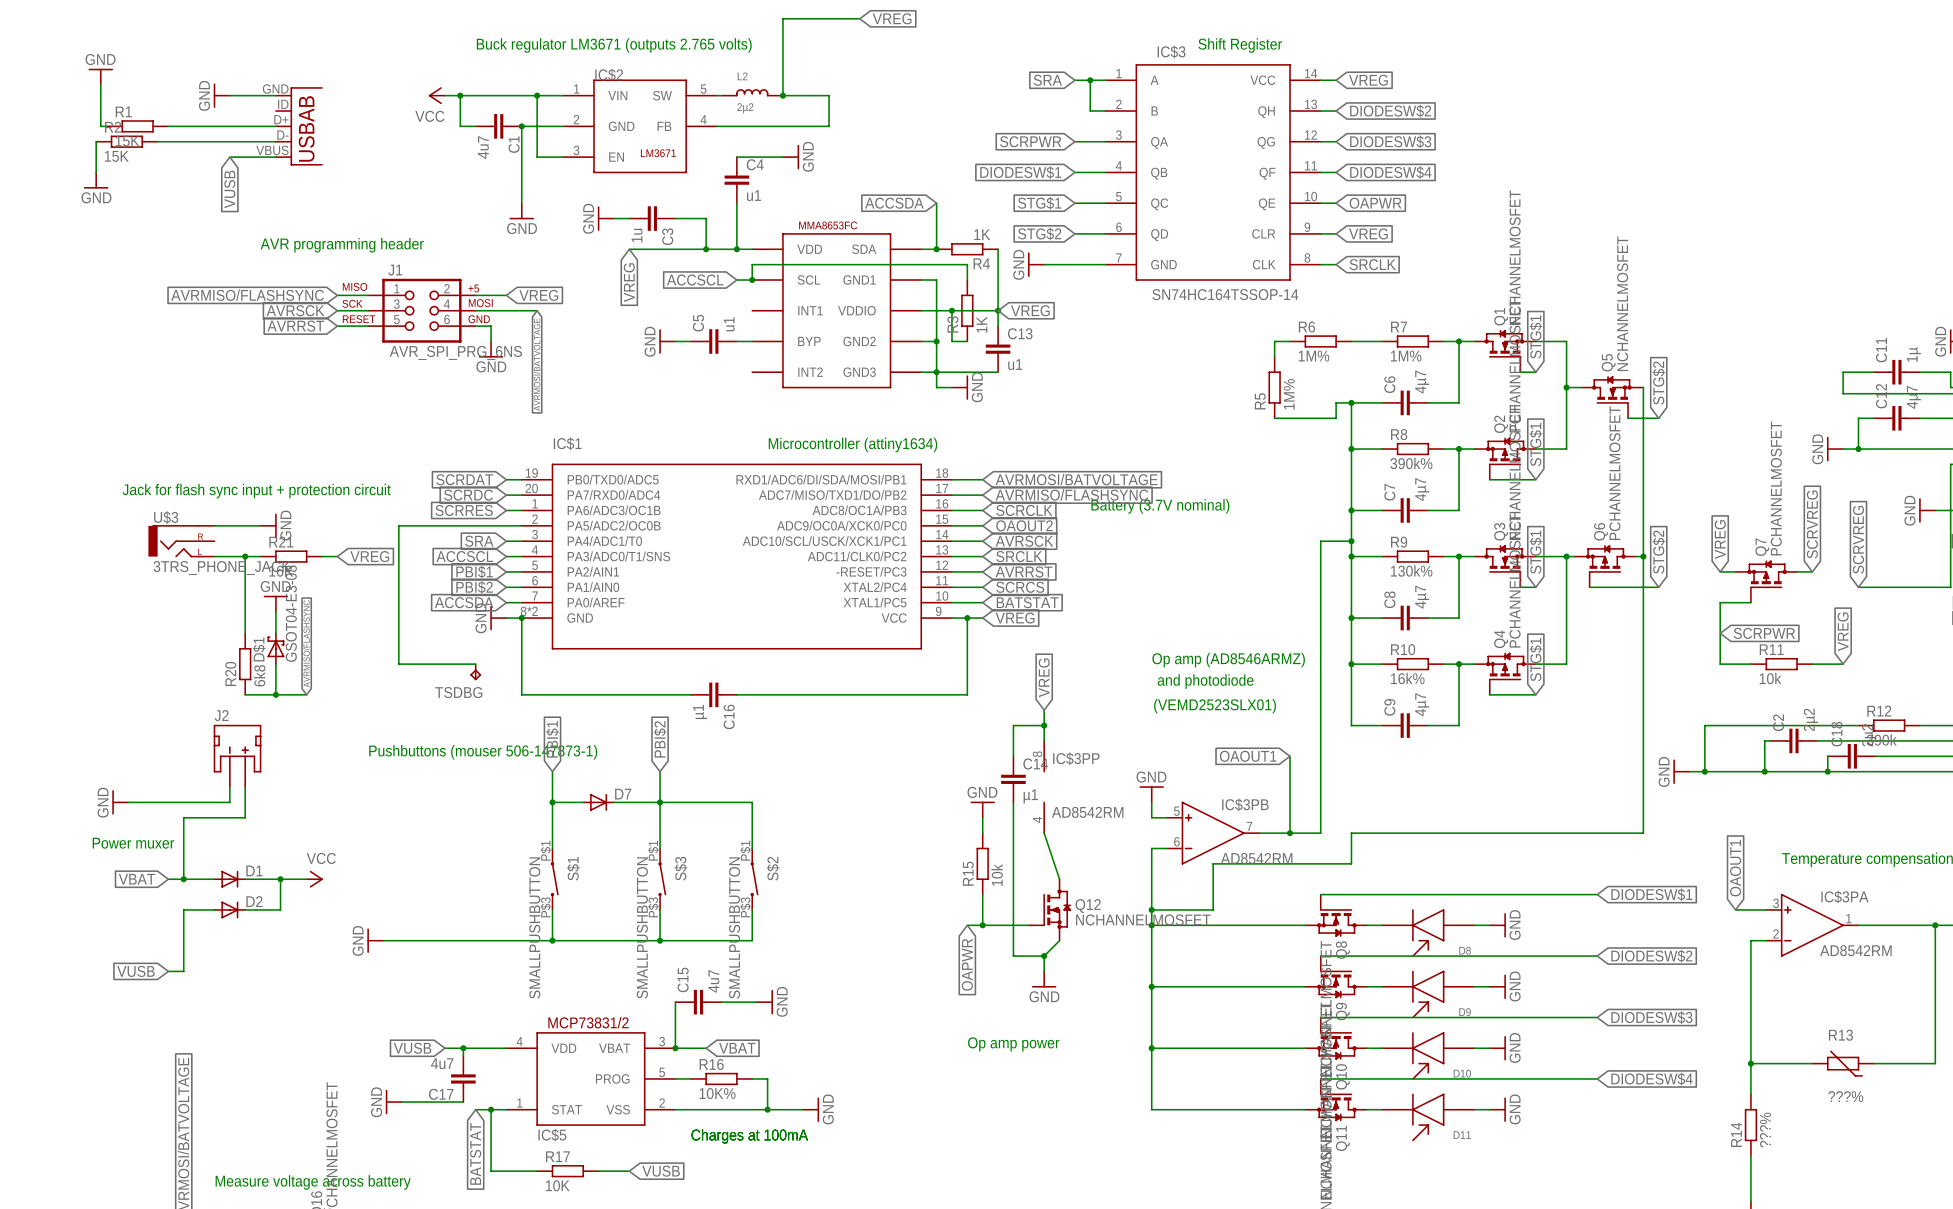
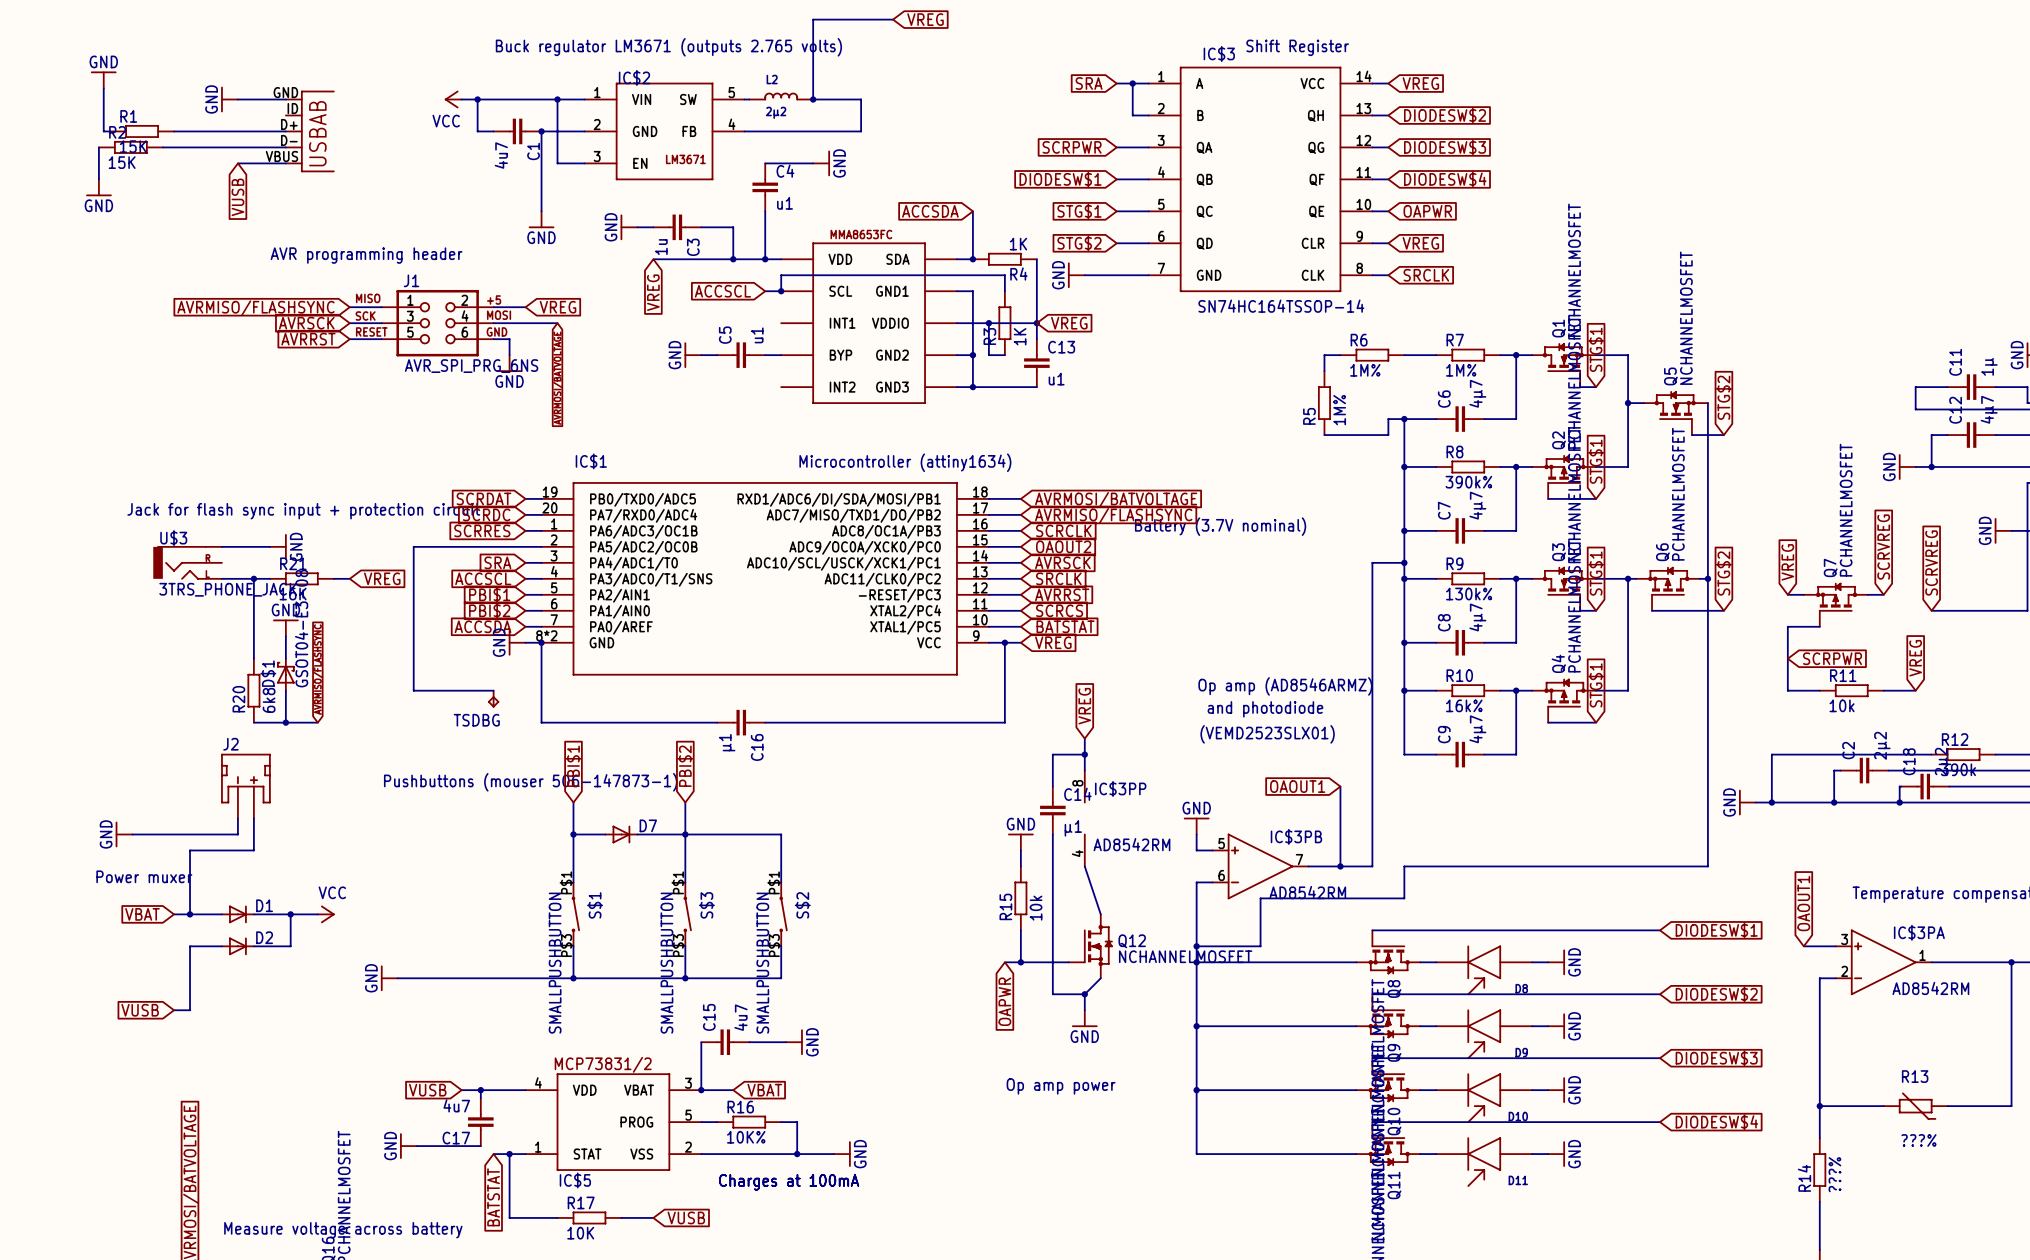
wire: (936, 372) (936, 387) (951, 387) -> none
power symbol: GND (960, 387) -> none

